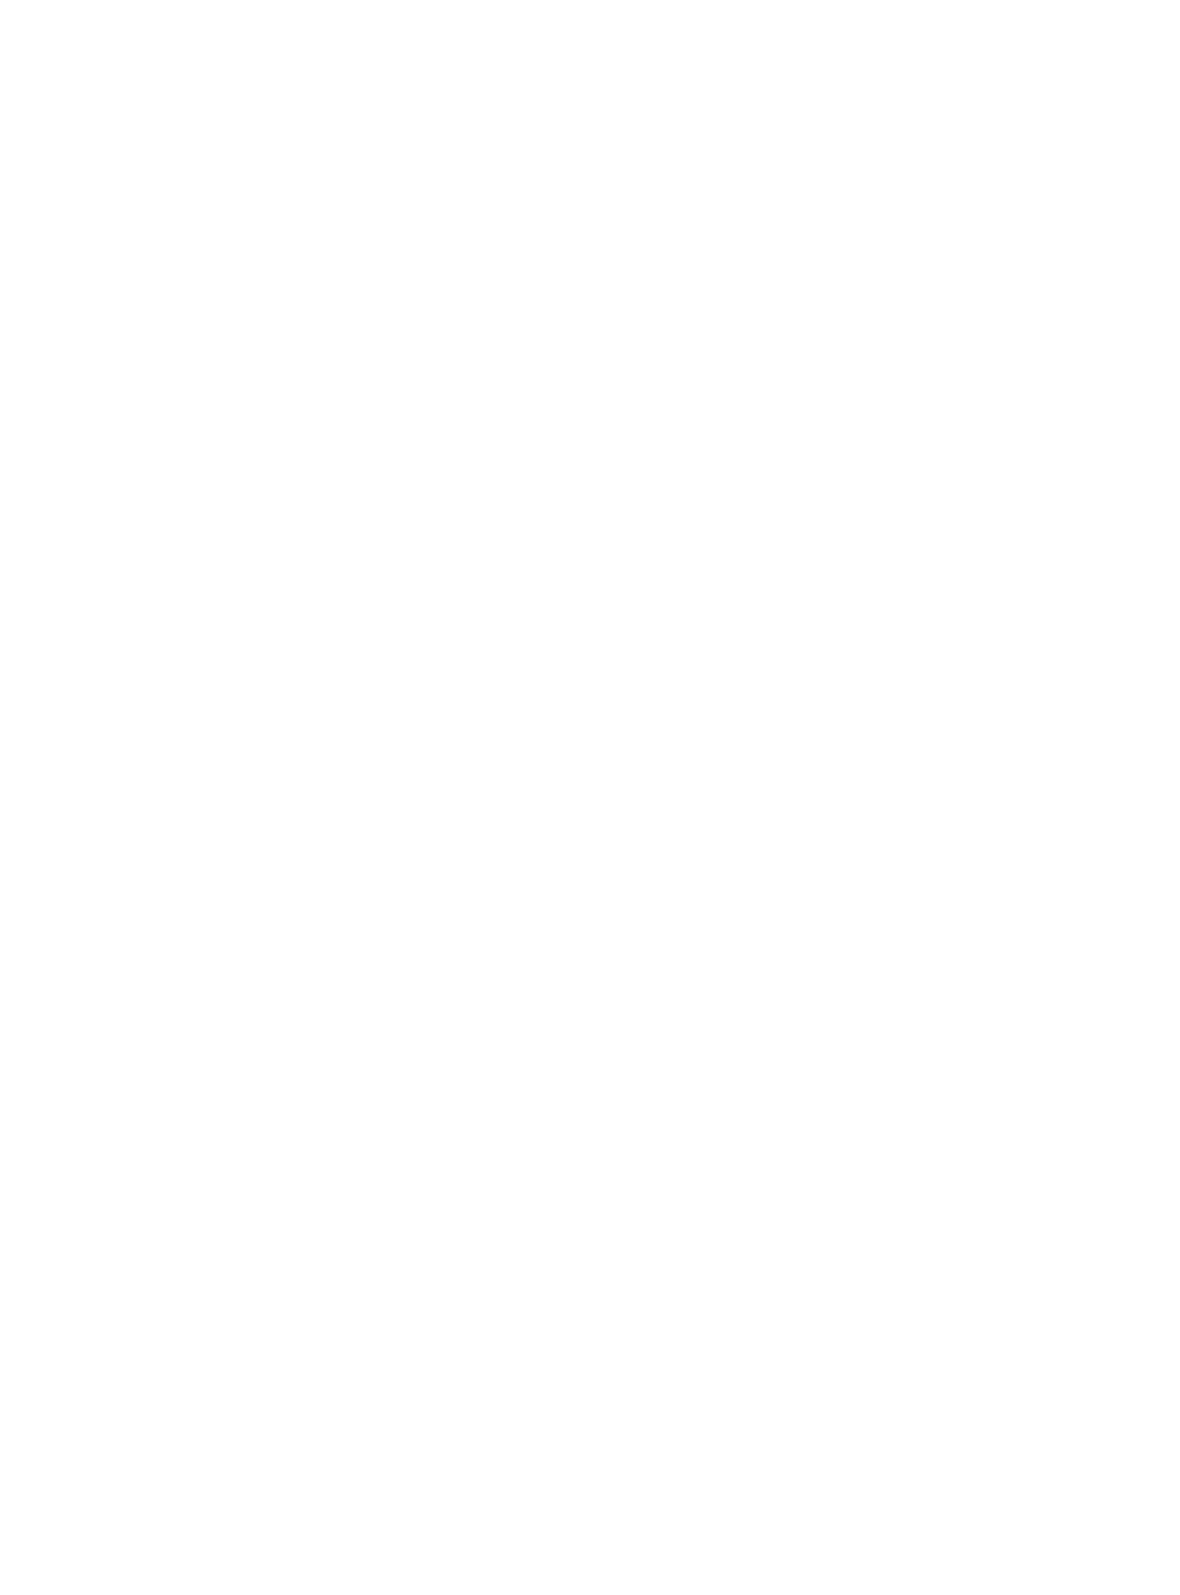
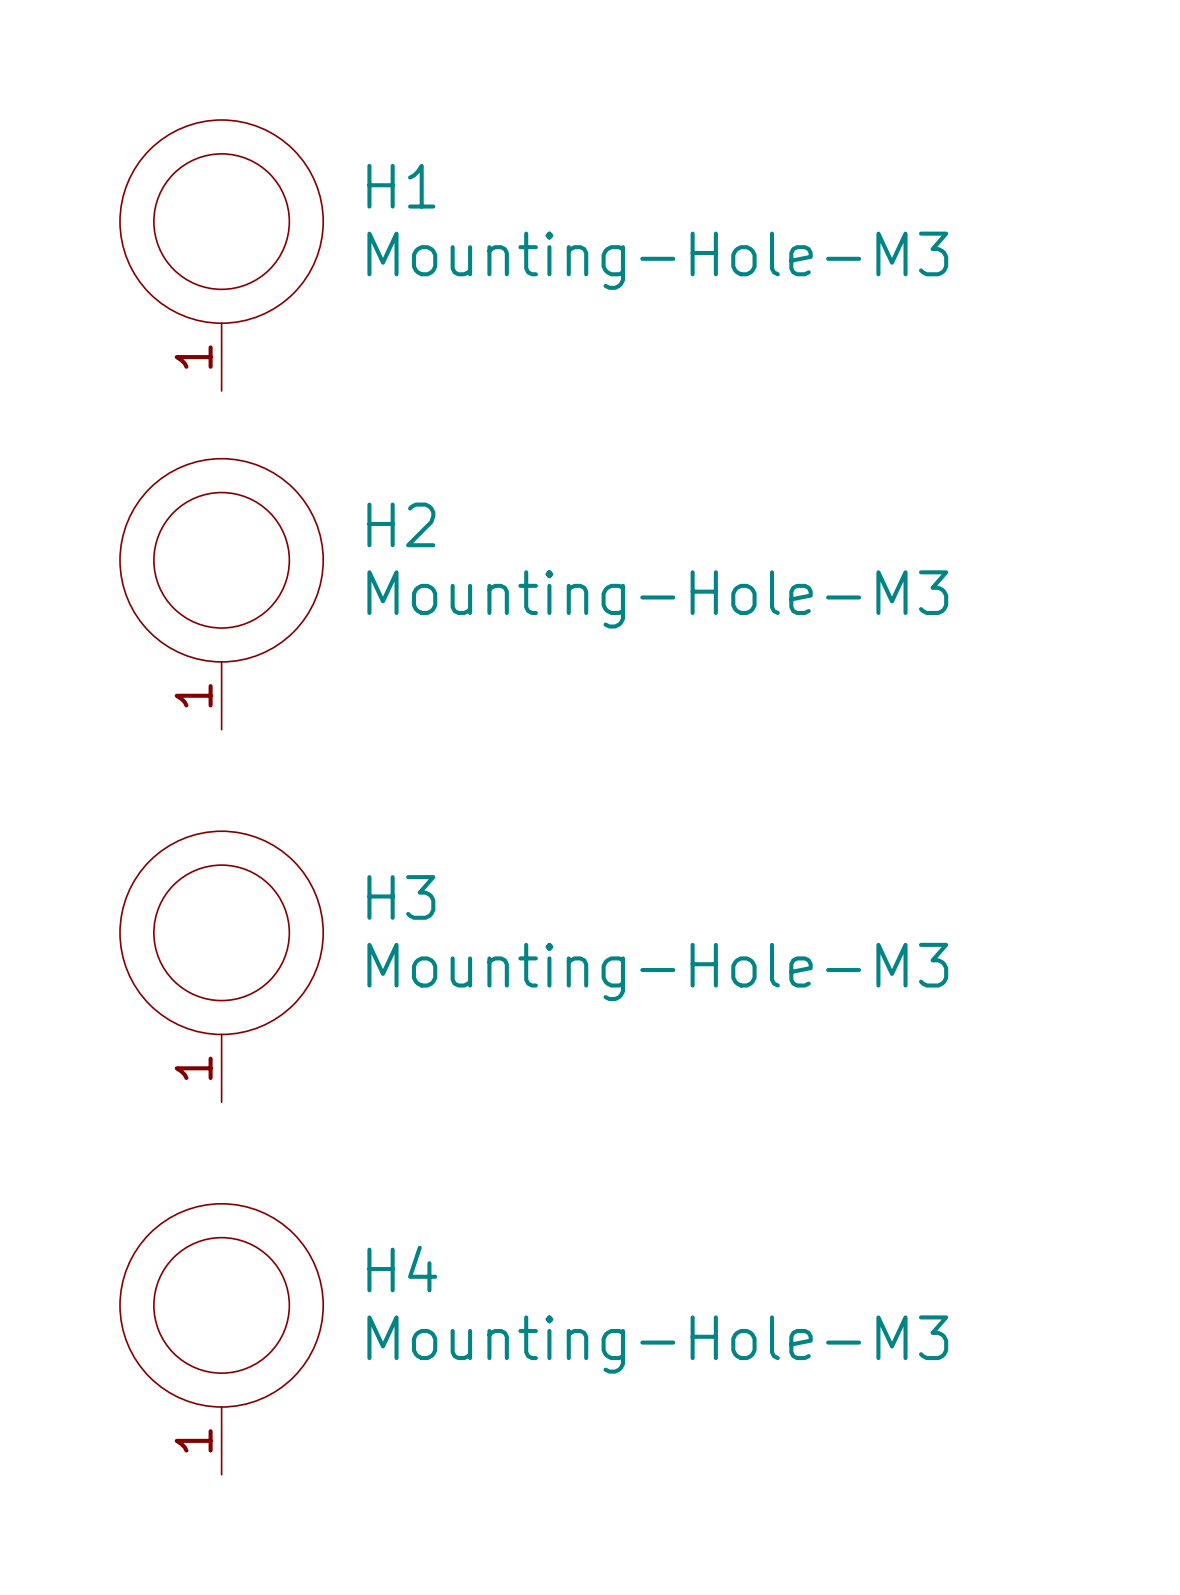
H1: none -> Mounting-Hole-M3 (221, 255)
H2: none -> Mounting-Hole-M3 (221, 594)
H3: none -> Mounting-Hole-M3 (221, 966)
H4: none -> Mounting-Hole-M3 (221, 1339)

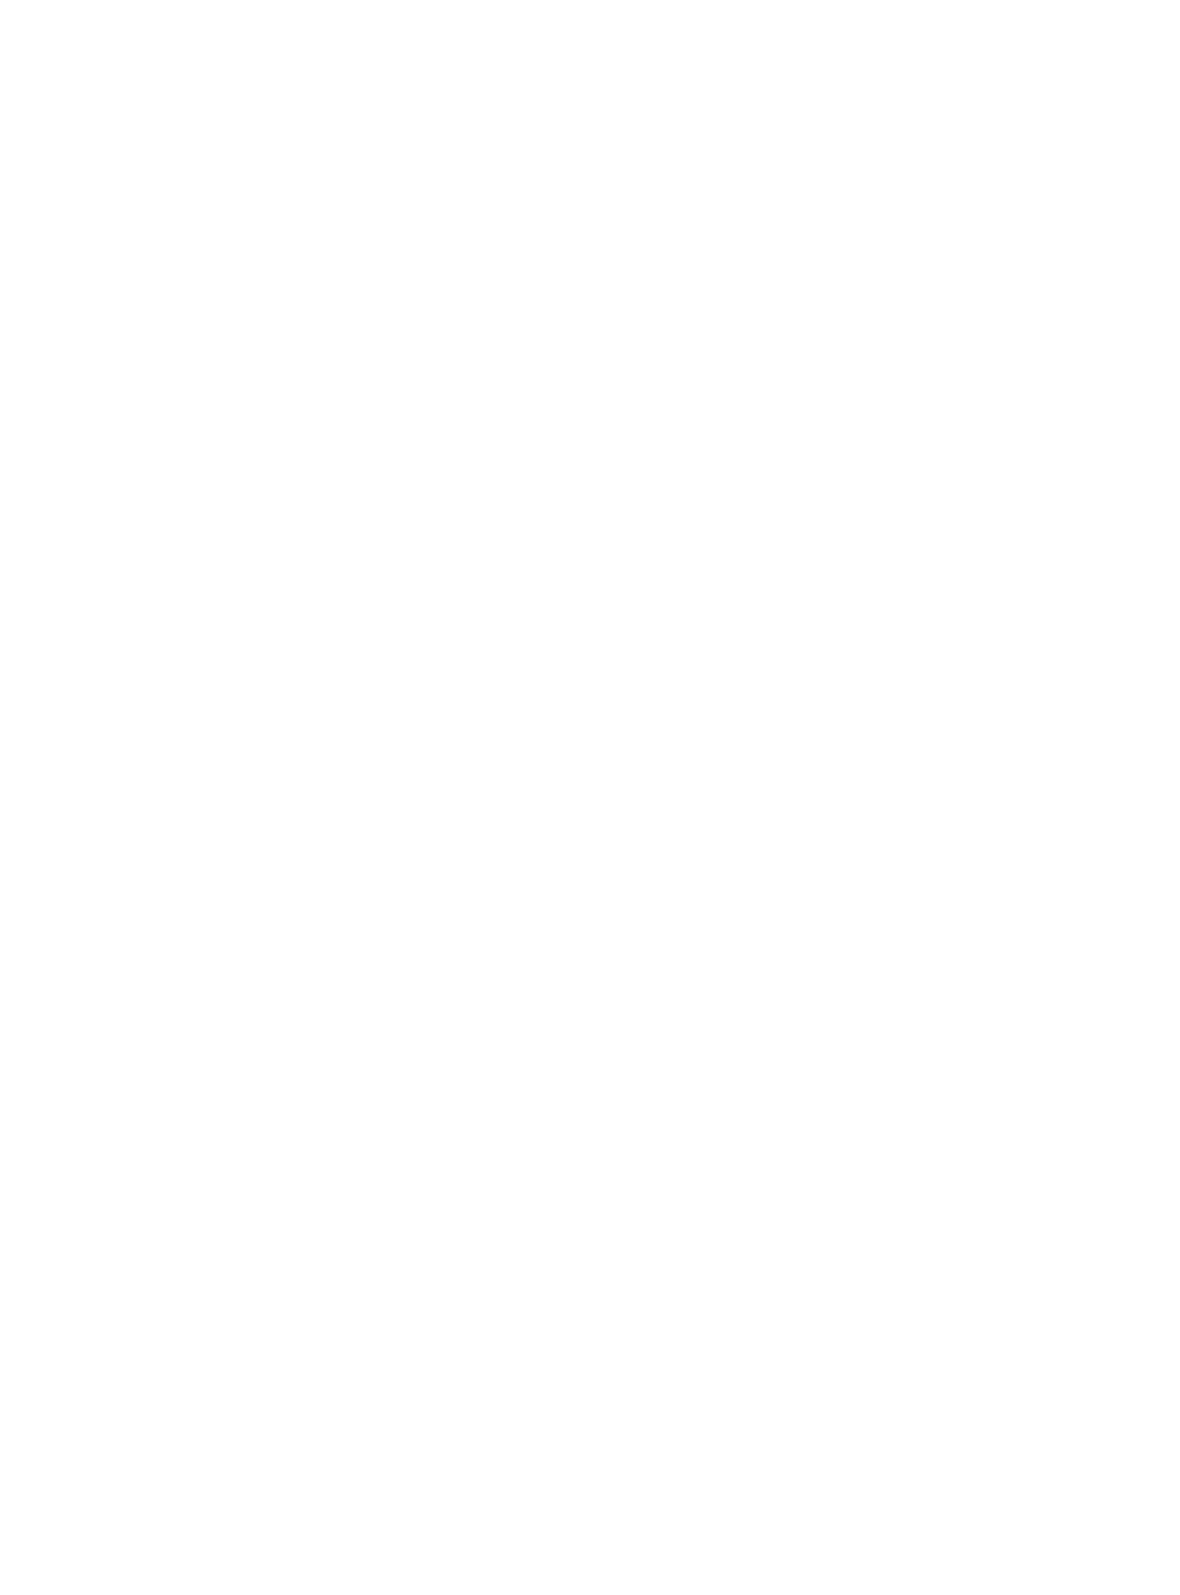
H1: Mounting-Hole-M3 (221, 255) -> none
H2: Mounting-Hole-M3 (221, 594) -> none
H3: Mounting-Hole-M3 (221, 966) -> none
H4: Mounting-Hole-M3 (221, 1339) -> none

